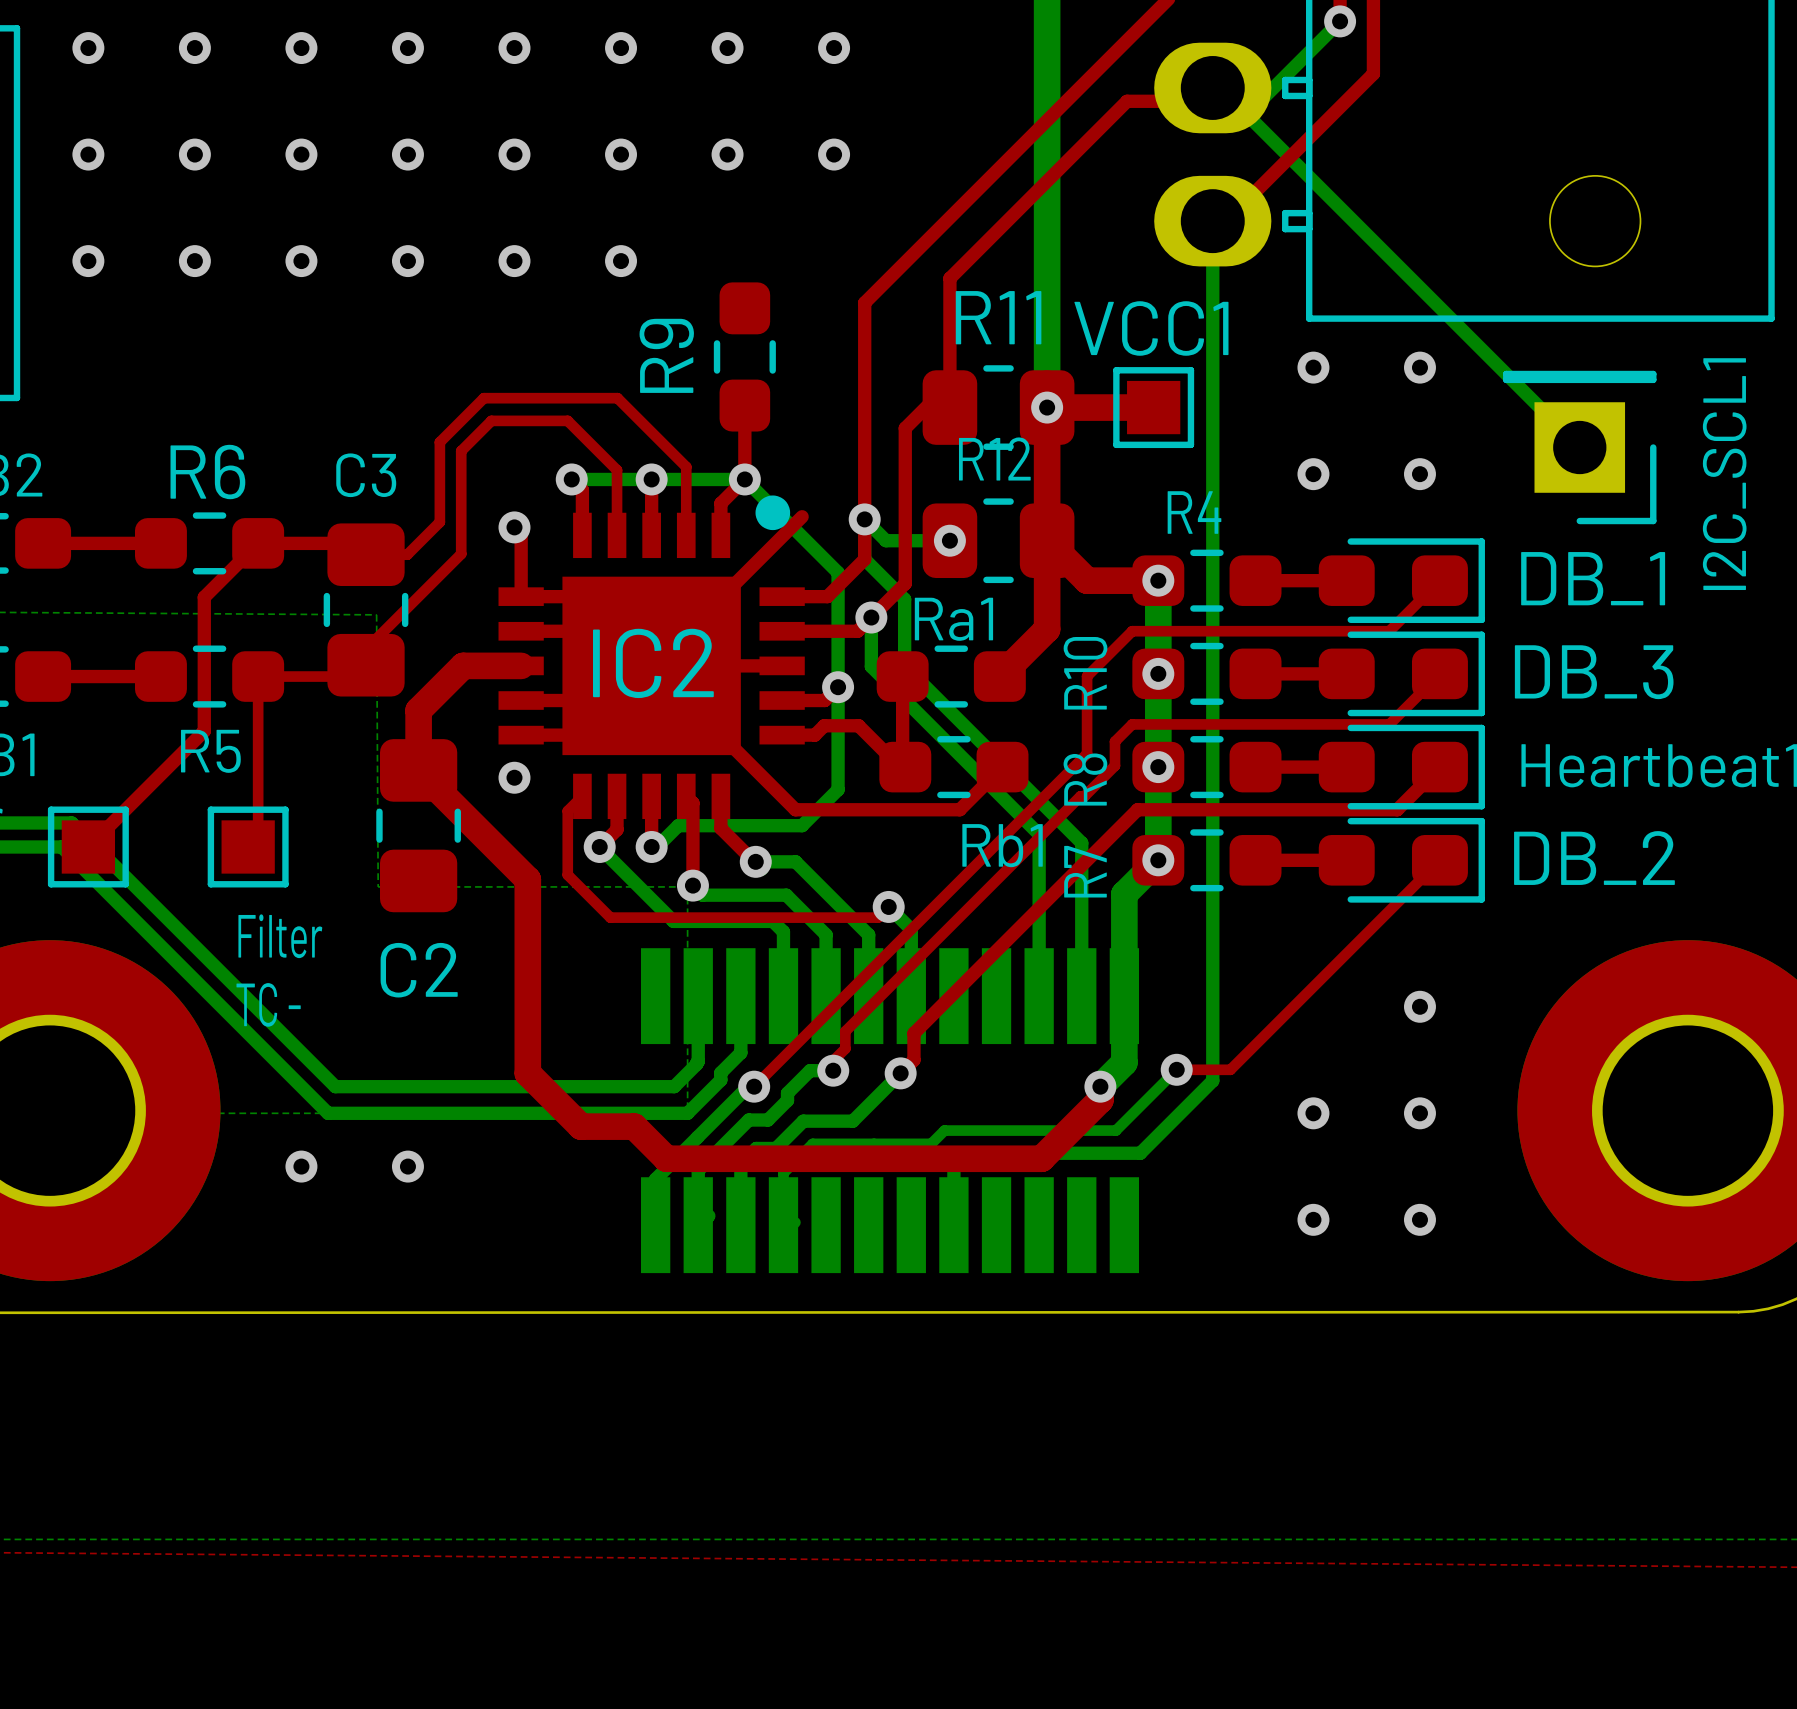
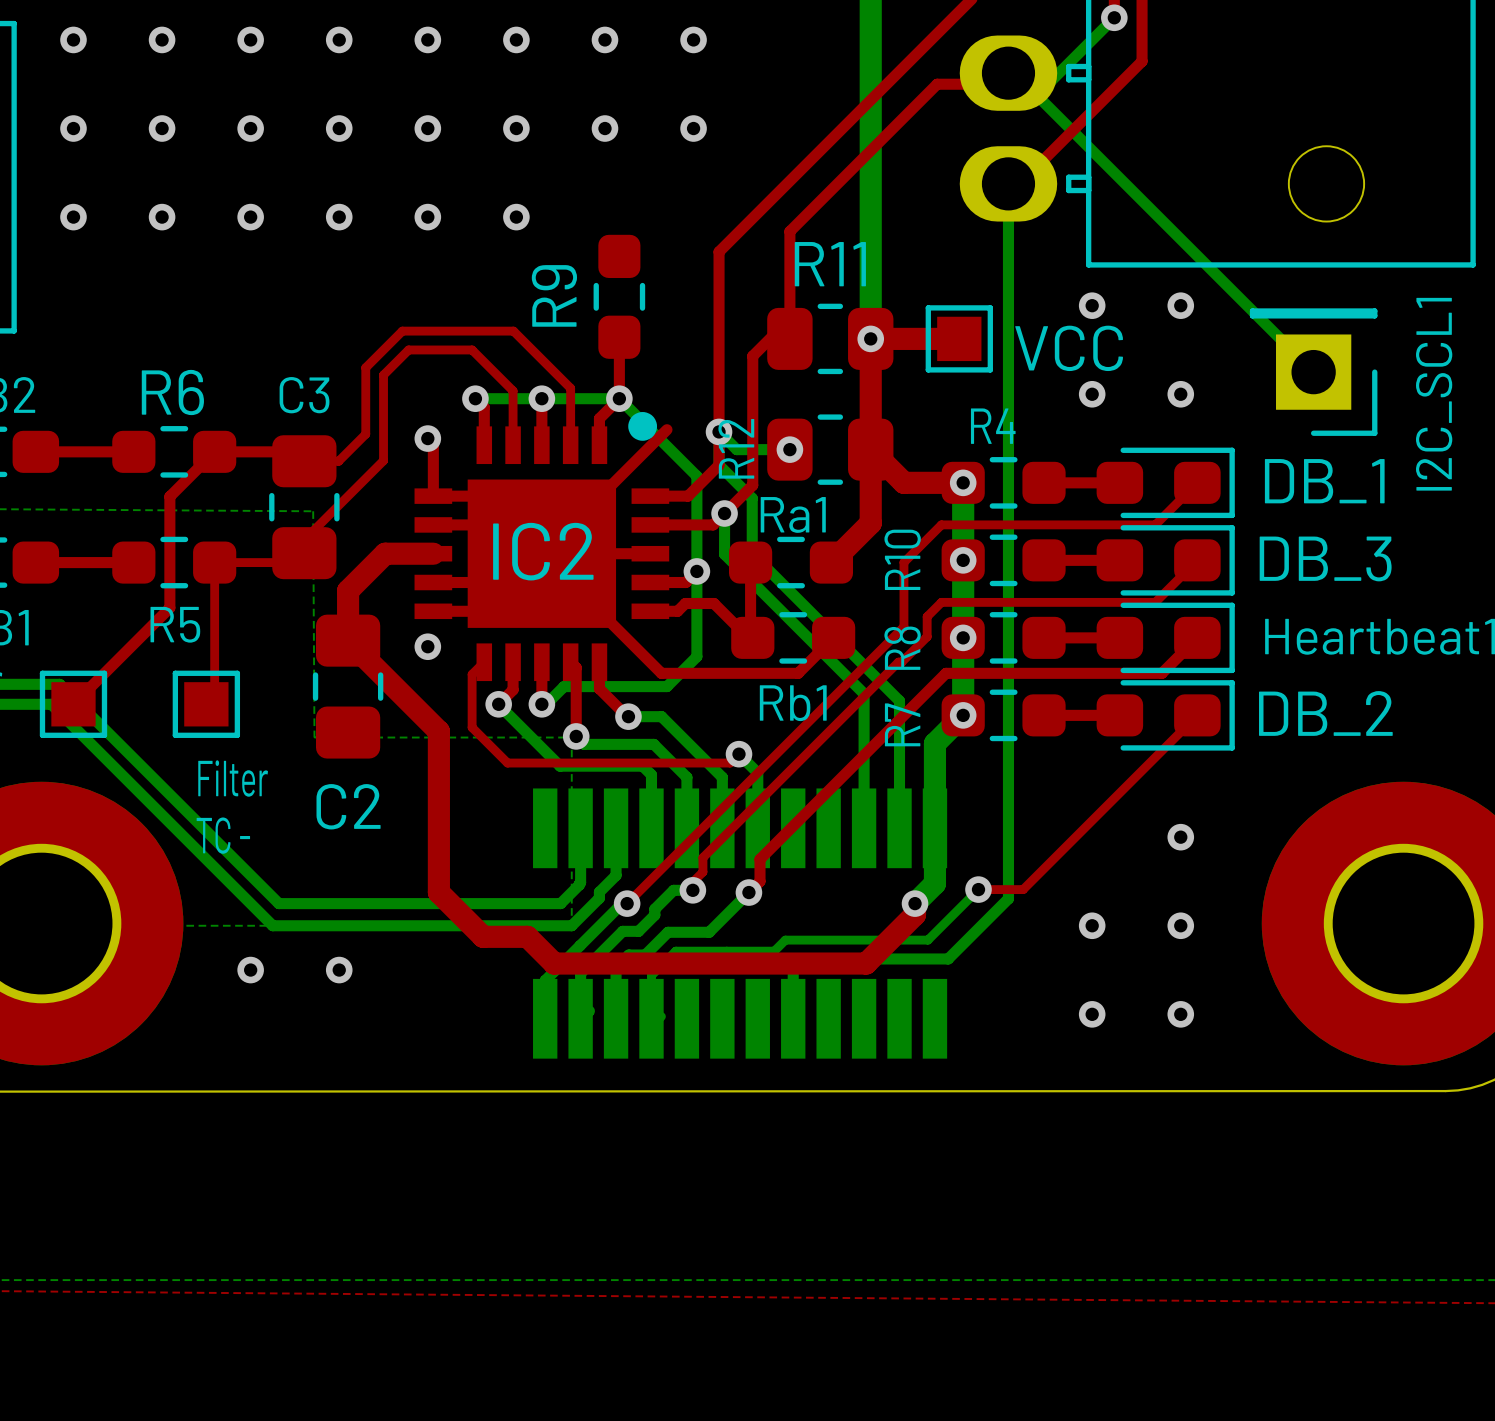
VCC1 name: VCC1 (1151, 328) -> VCC (1069, 348)
R12 name rotation: 0° (994, 458) -> 90° counterclockwise (736, 448)
R12 name position: R12 (994, 458) -> R12 (736, 448)
Rb1 name position: Rb1 (1002, 845) -> Rb1 (793, 703)

